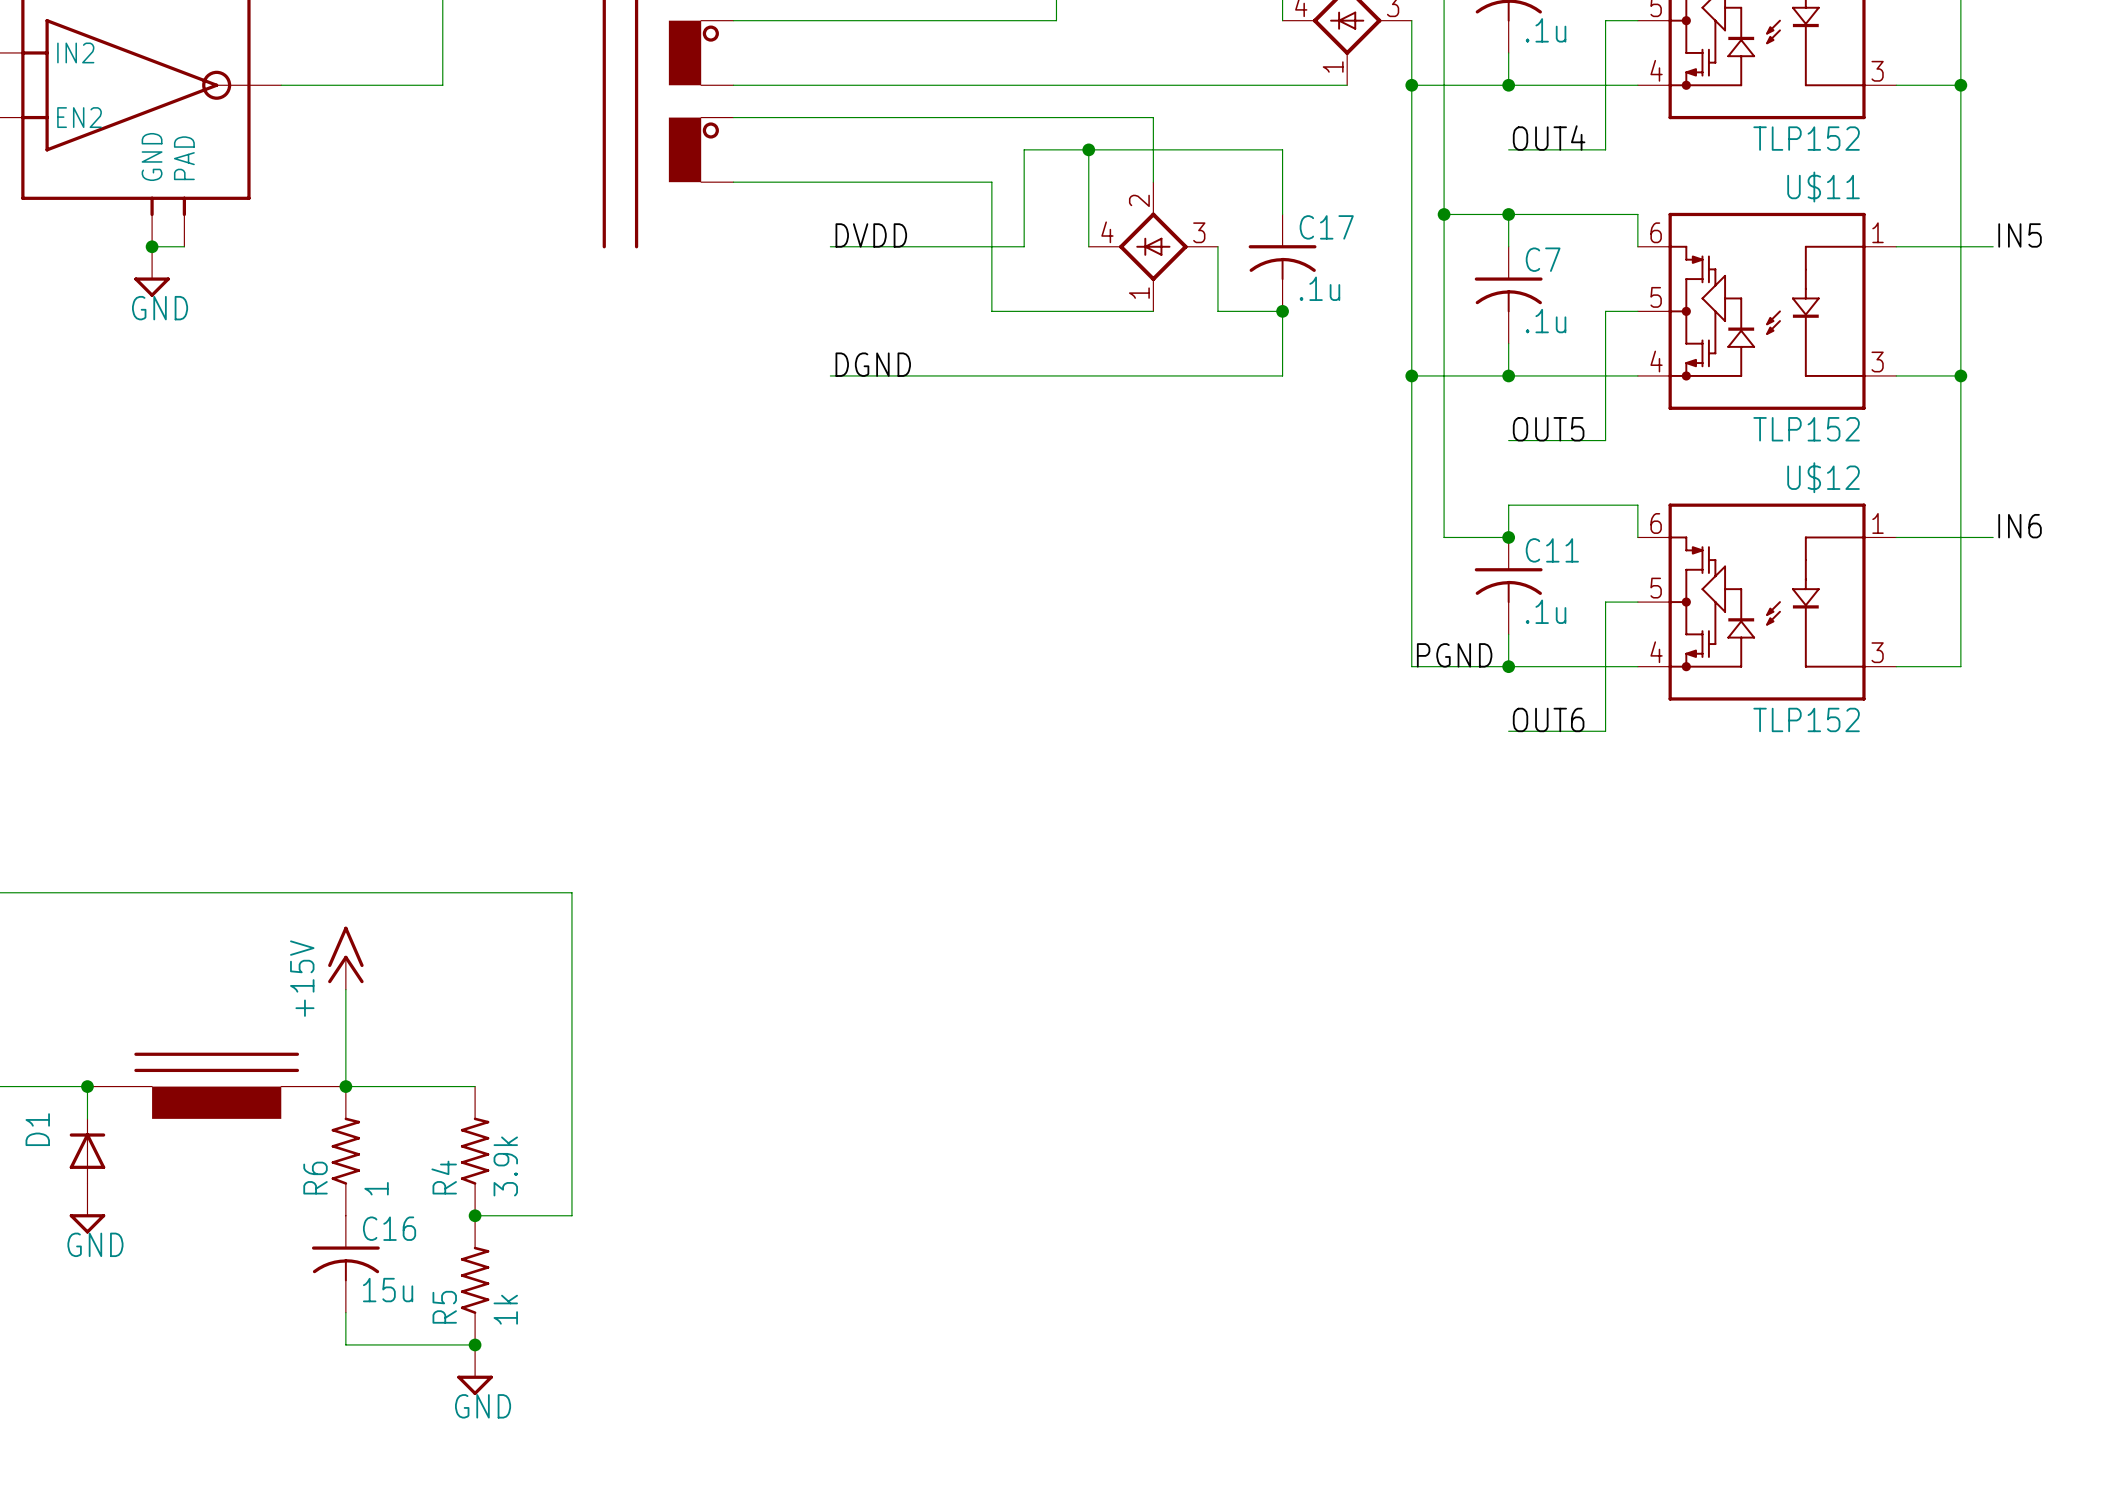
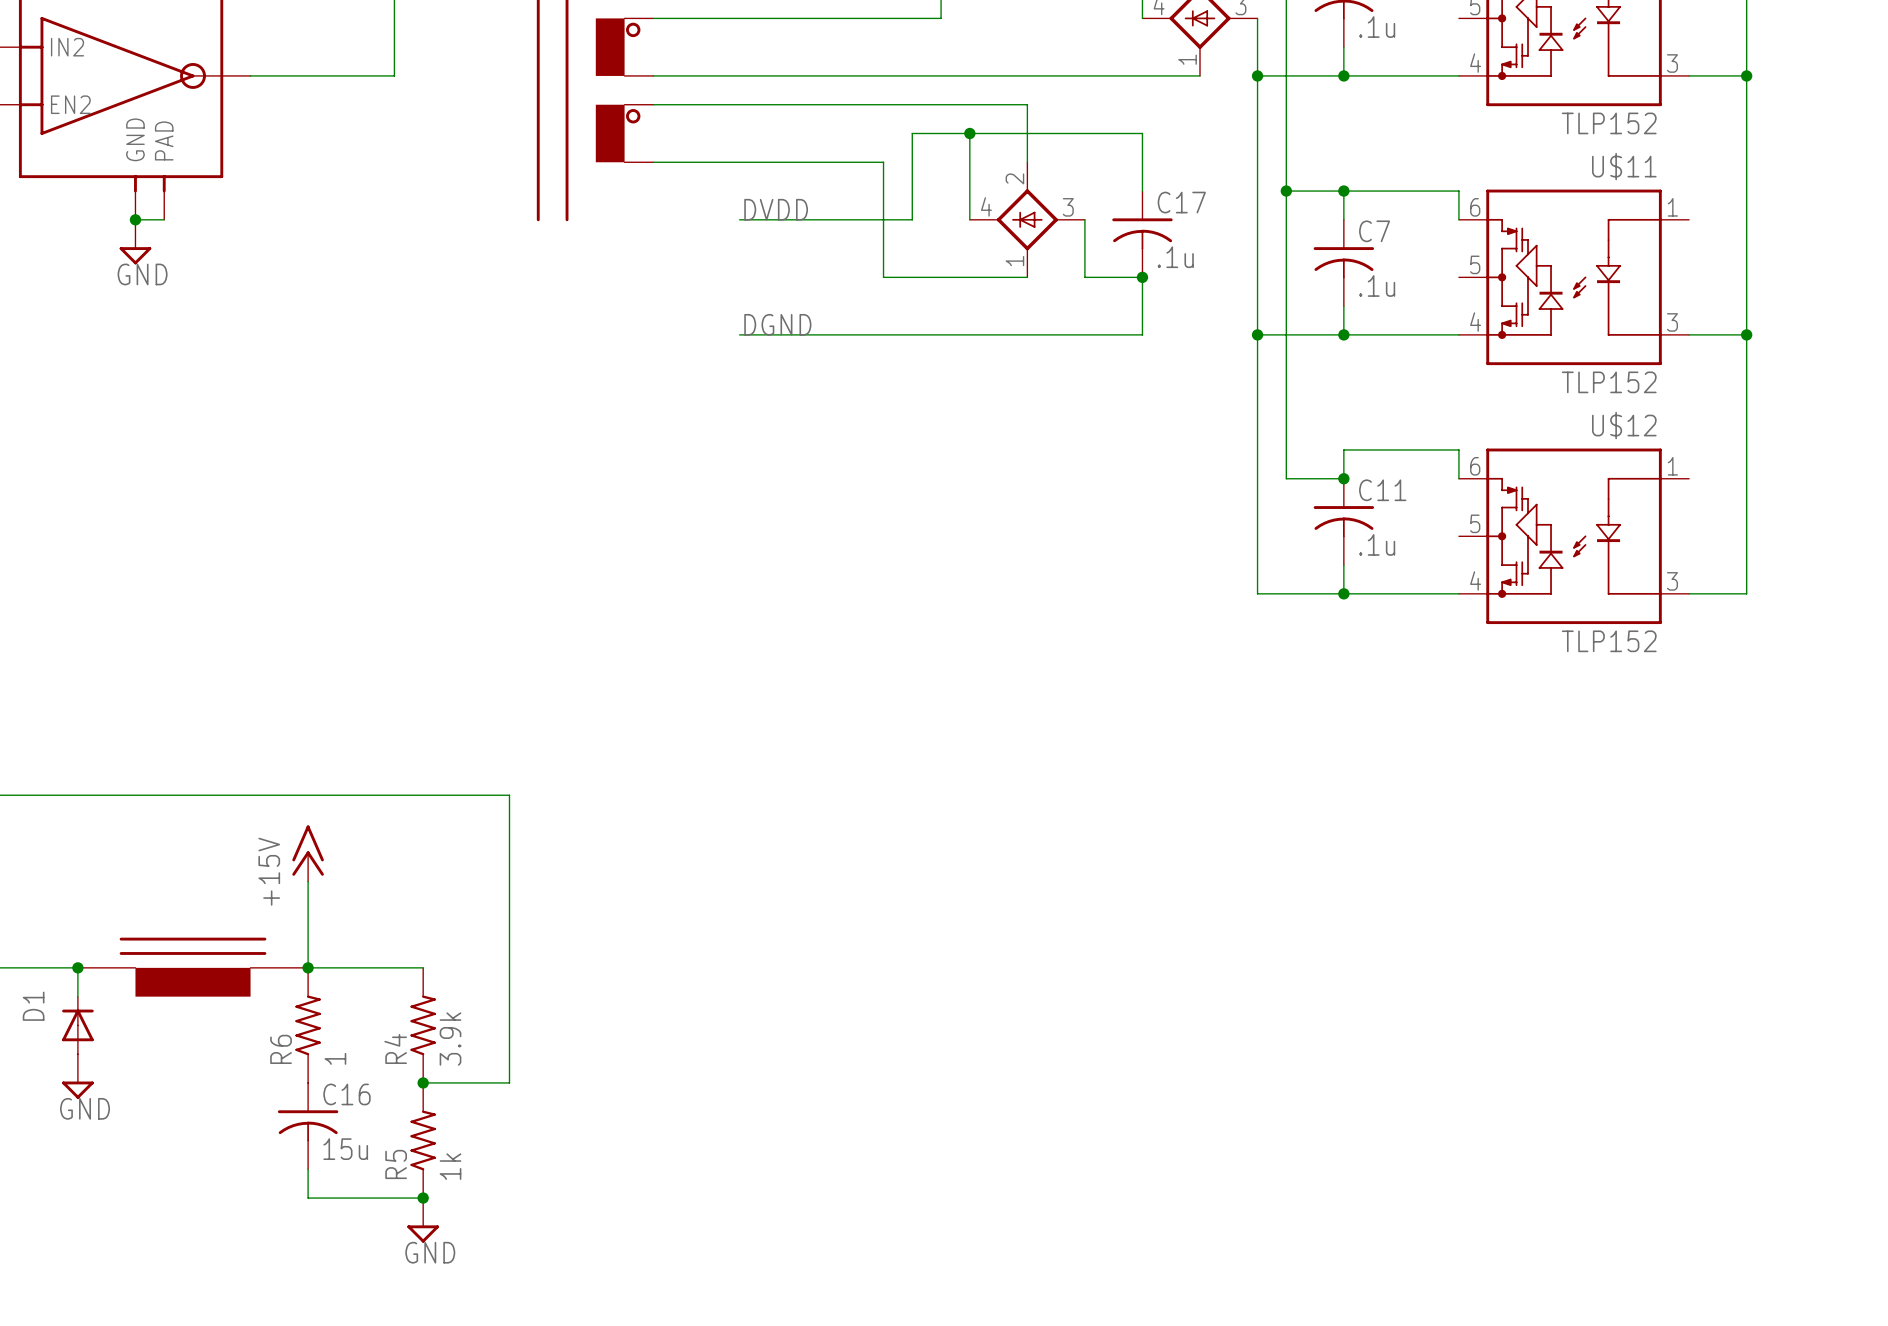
wire: (1637, 20) (1605, 20) (1605, 149) (1508, 149) -> none
label: OUT4 (1549, 138) -> none
label: IN5 (2020, 235) -> none
wire: (1896, 246) (1993, 246) -> none
wire: (1637, 311) (1605, 311) (1605, 440) (1508, 440) -> none
label: OUT5 (1548, 429) -> none
label: IN6 (2020, 526) -> none
wire: (1896, 537) (1993, 537) -> none
wire: (1637, 602) (1605, 602) (1605, 731) (1508, 731) -> none
label: PGND (1454, 655) -> none
label: OUT6 (1548, 719) -> none

